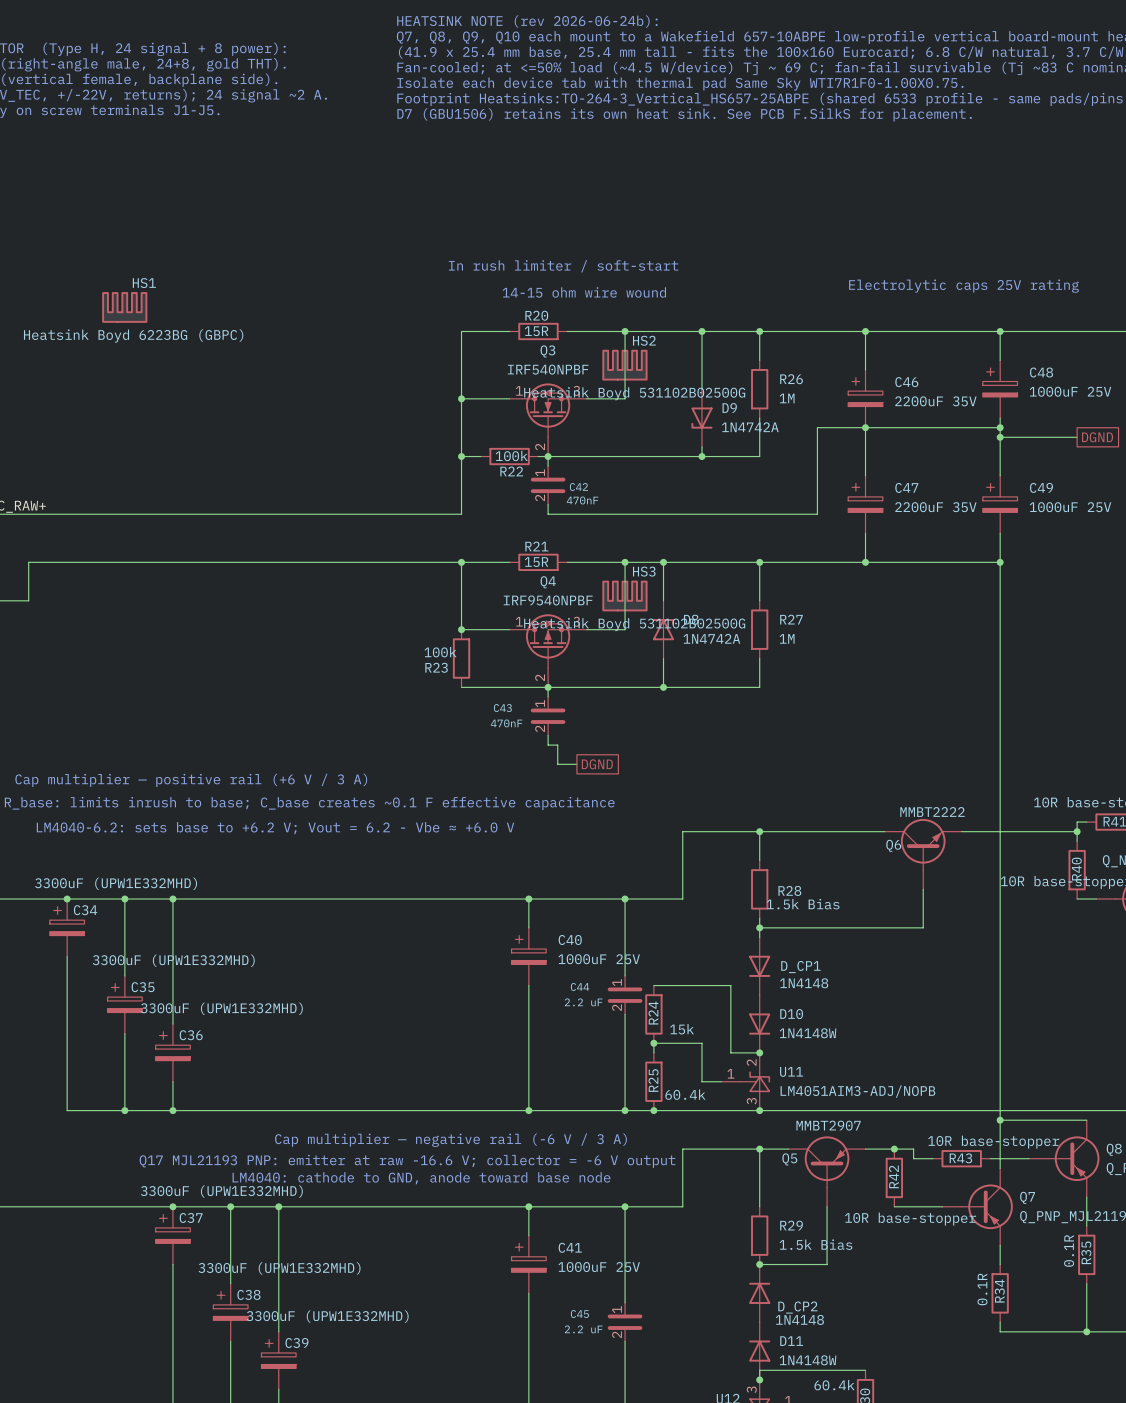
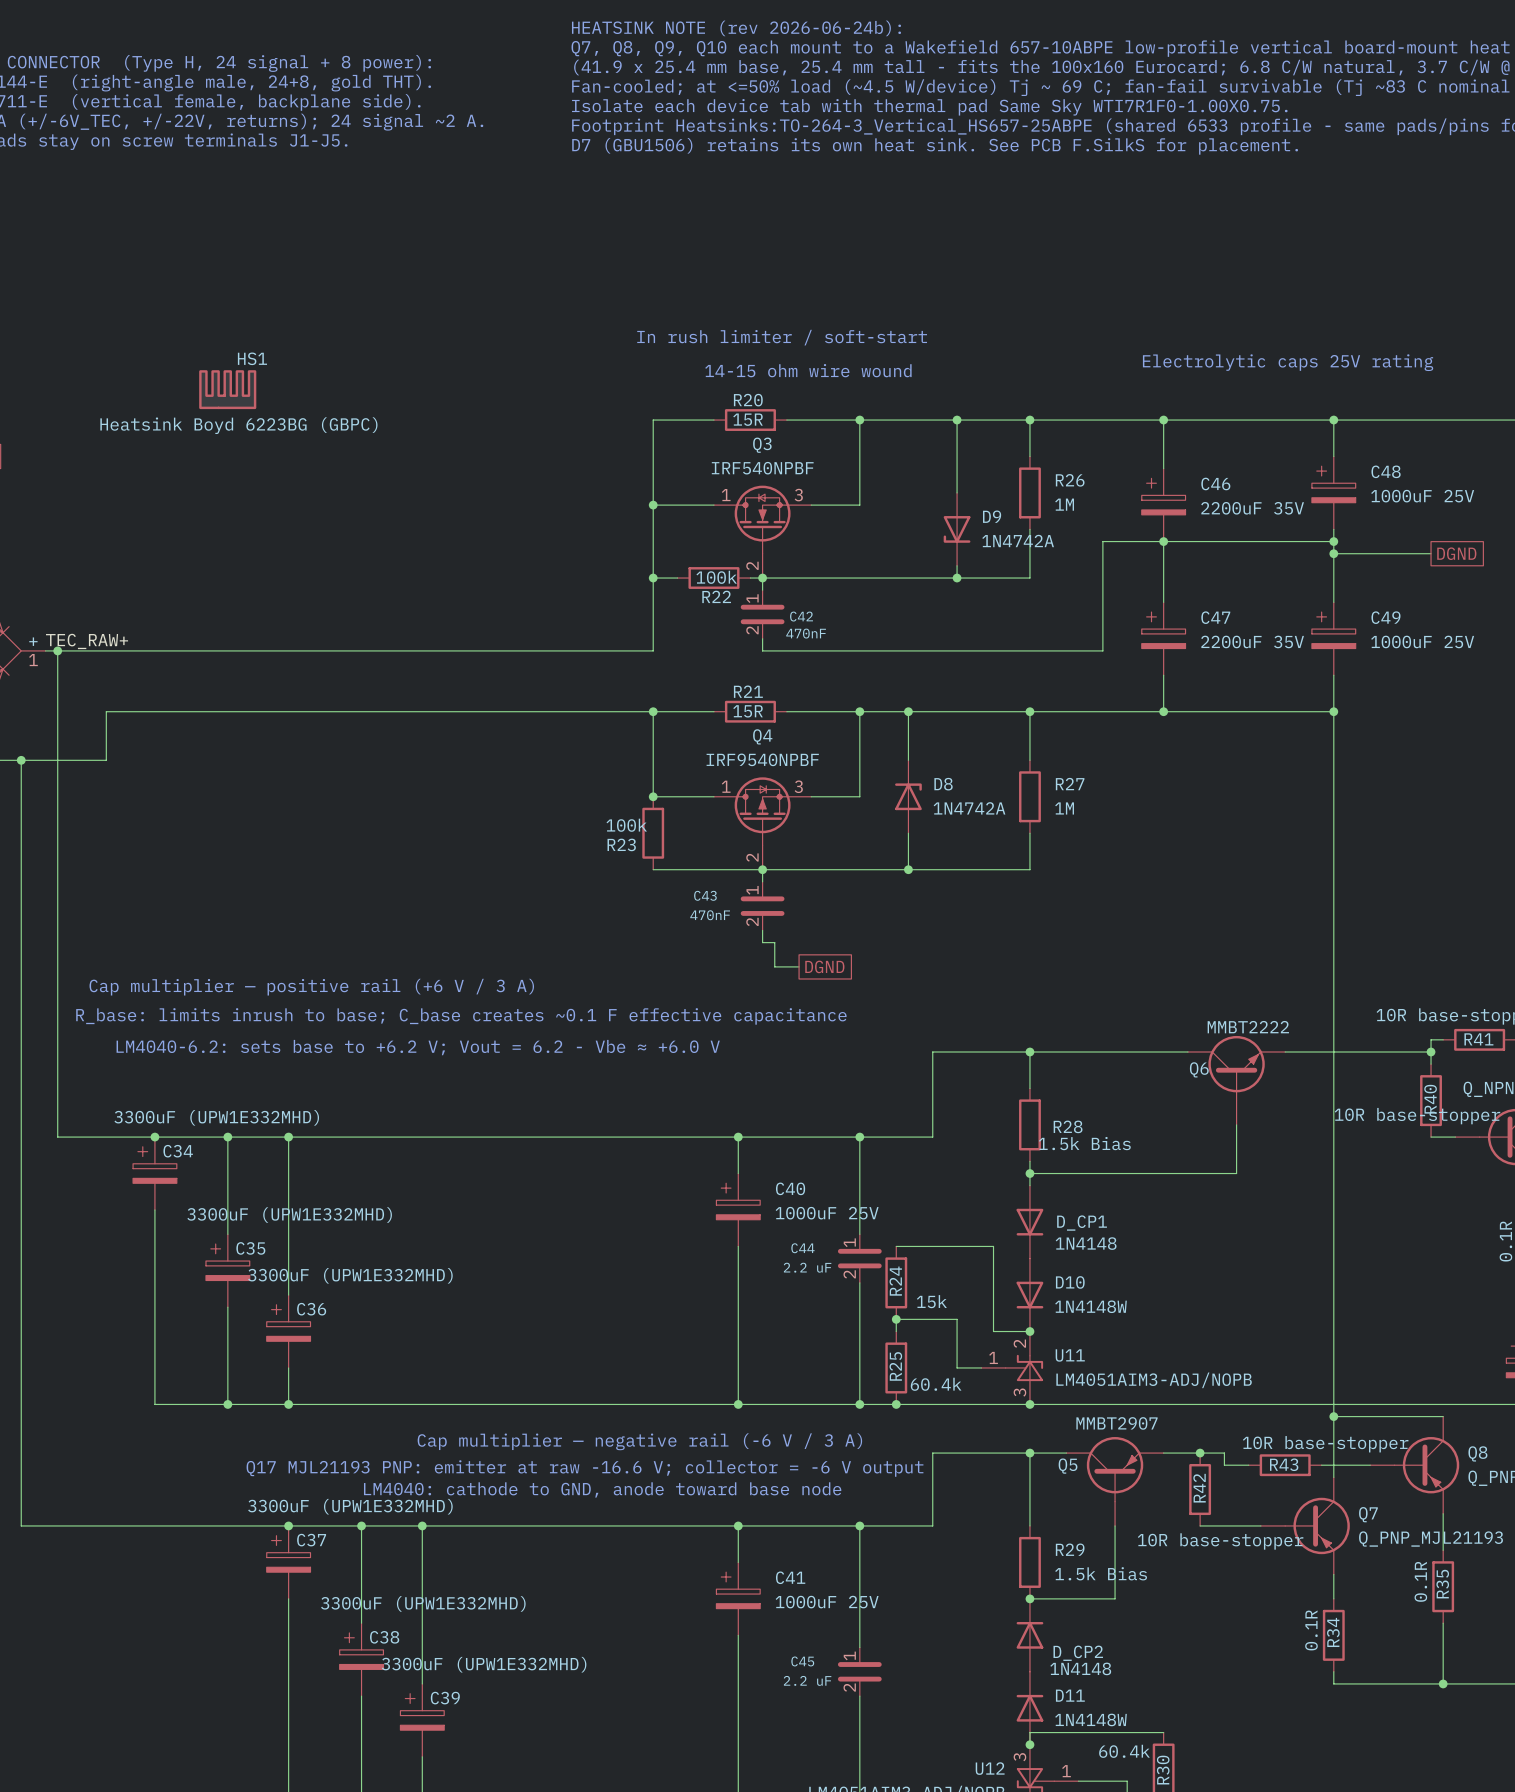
HS2: Heatsink Boyd 531102B02500G (624, 365) -> none
HS3: Heatsink Boyd 531102B02500G (624, 596) -> none

